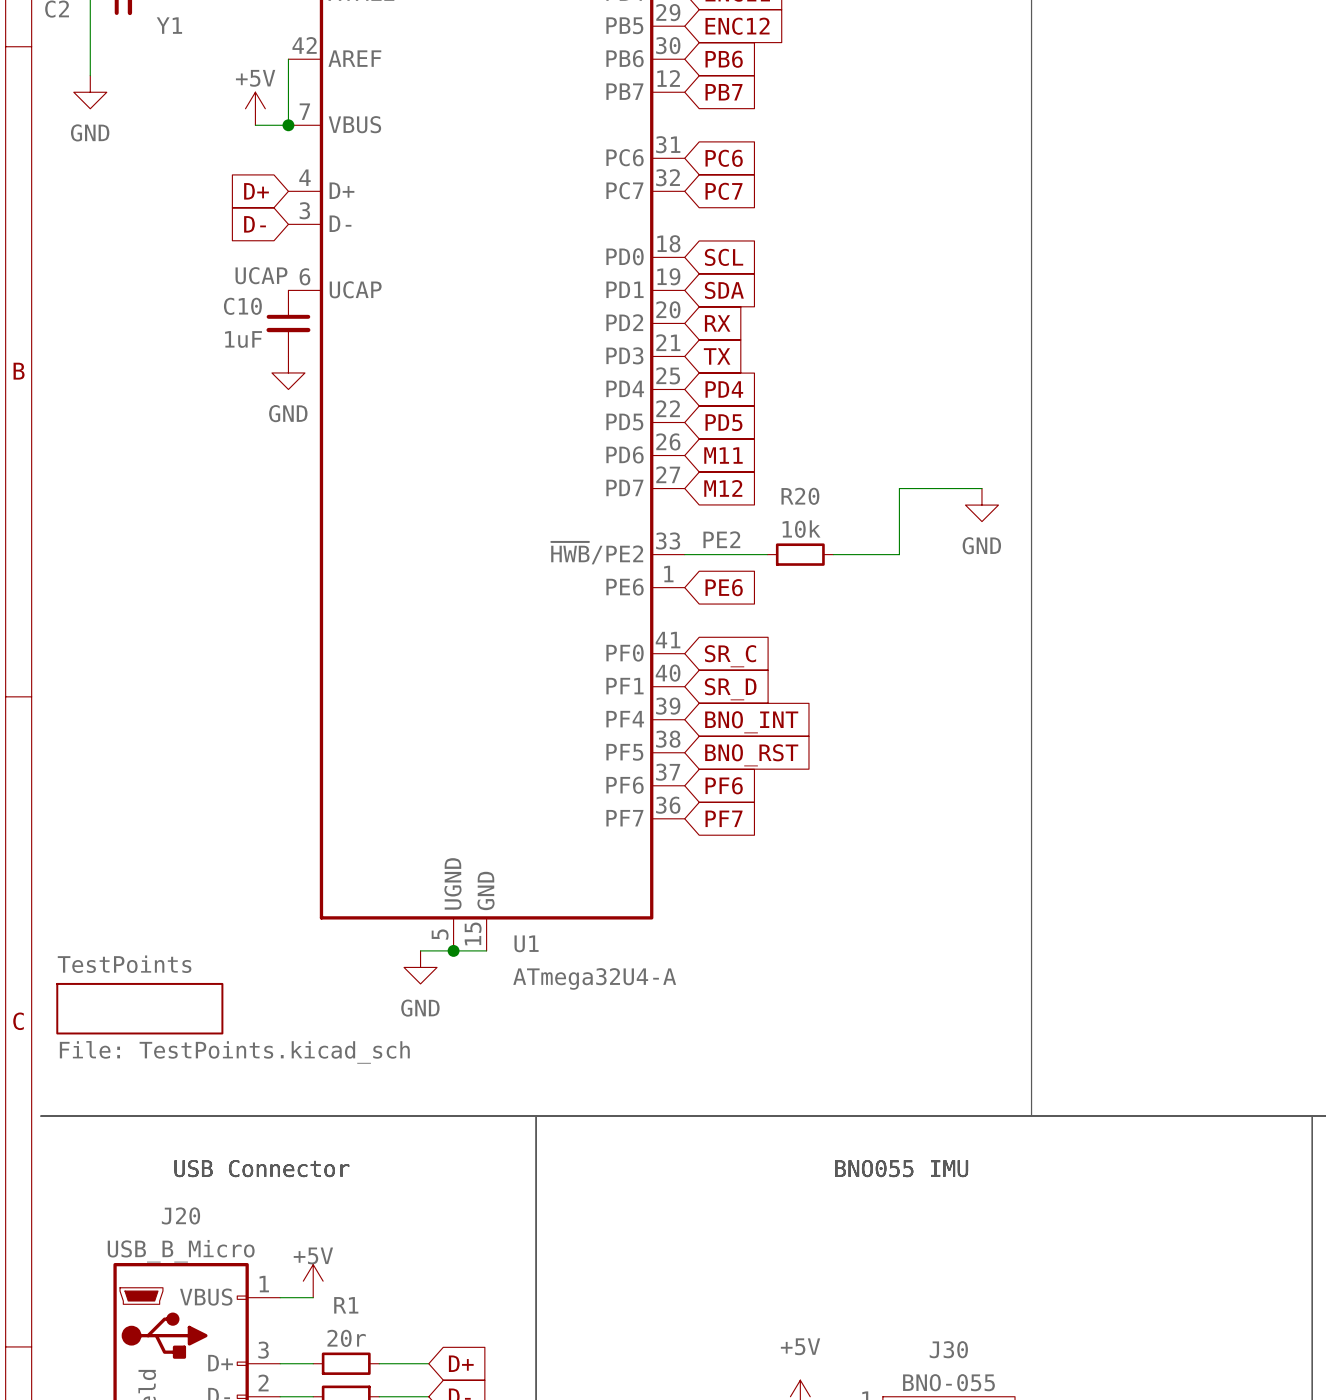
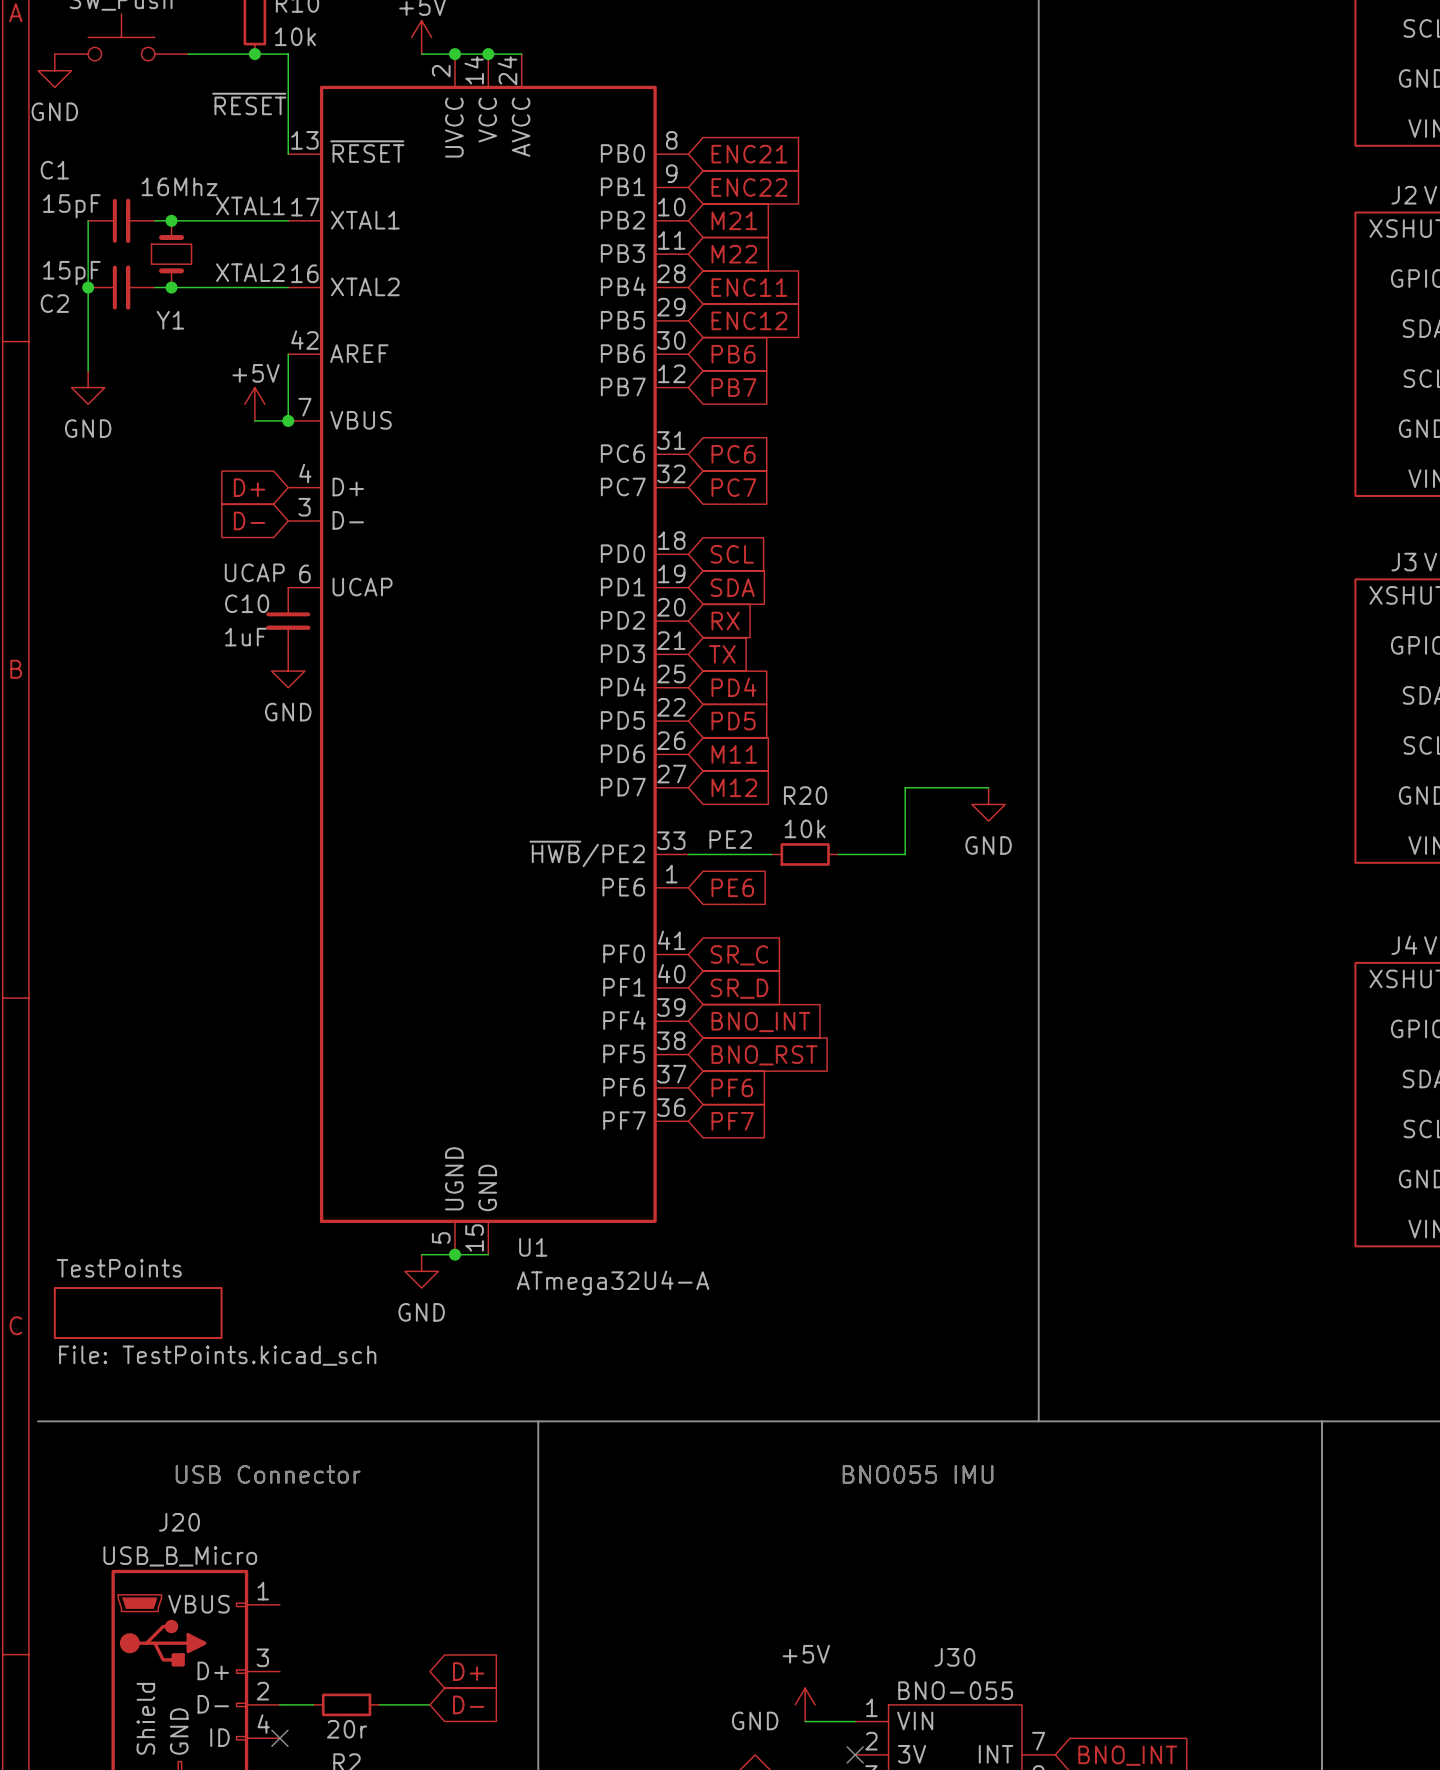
power symbol: +5V (313, 1281) -> none
wire: (280, 1297) (313, 1297) -> none
wire: (280, 1363) (313, 1363) -> none
R1: 20r (346, 1363) -> none
wire: (379, 1363) (428, 1363) -> none

